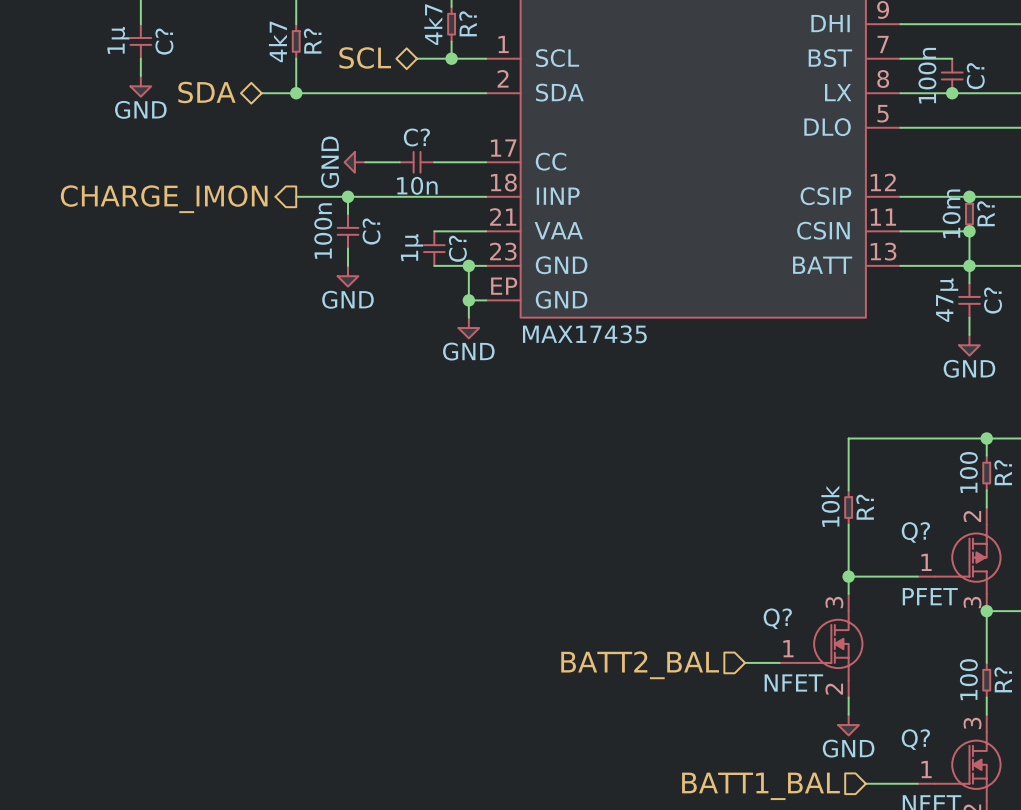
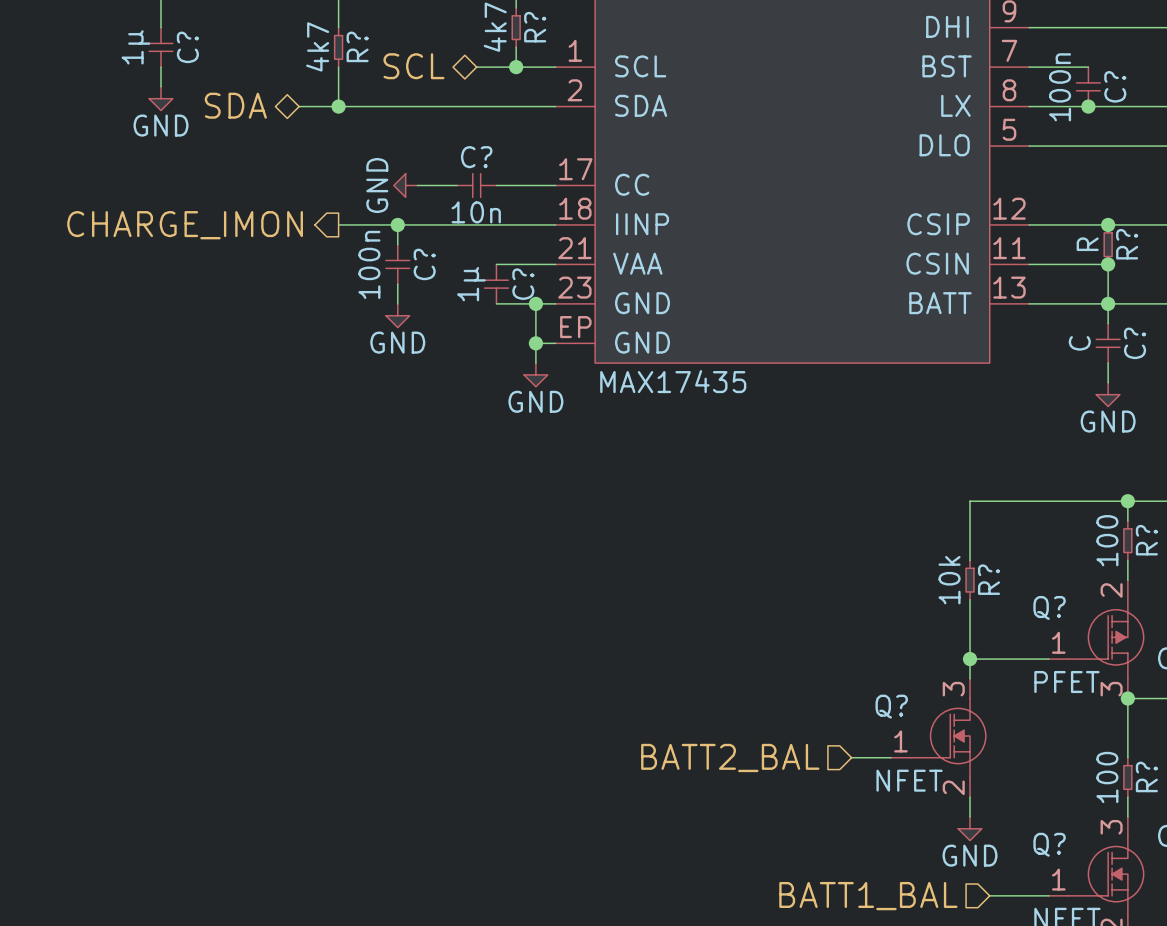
R? value: 10m (951, 213) -> R (1087, 244)
C? value: 47µ (947, 300) -> C (1079, 343)

